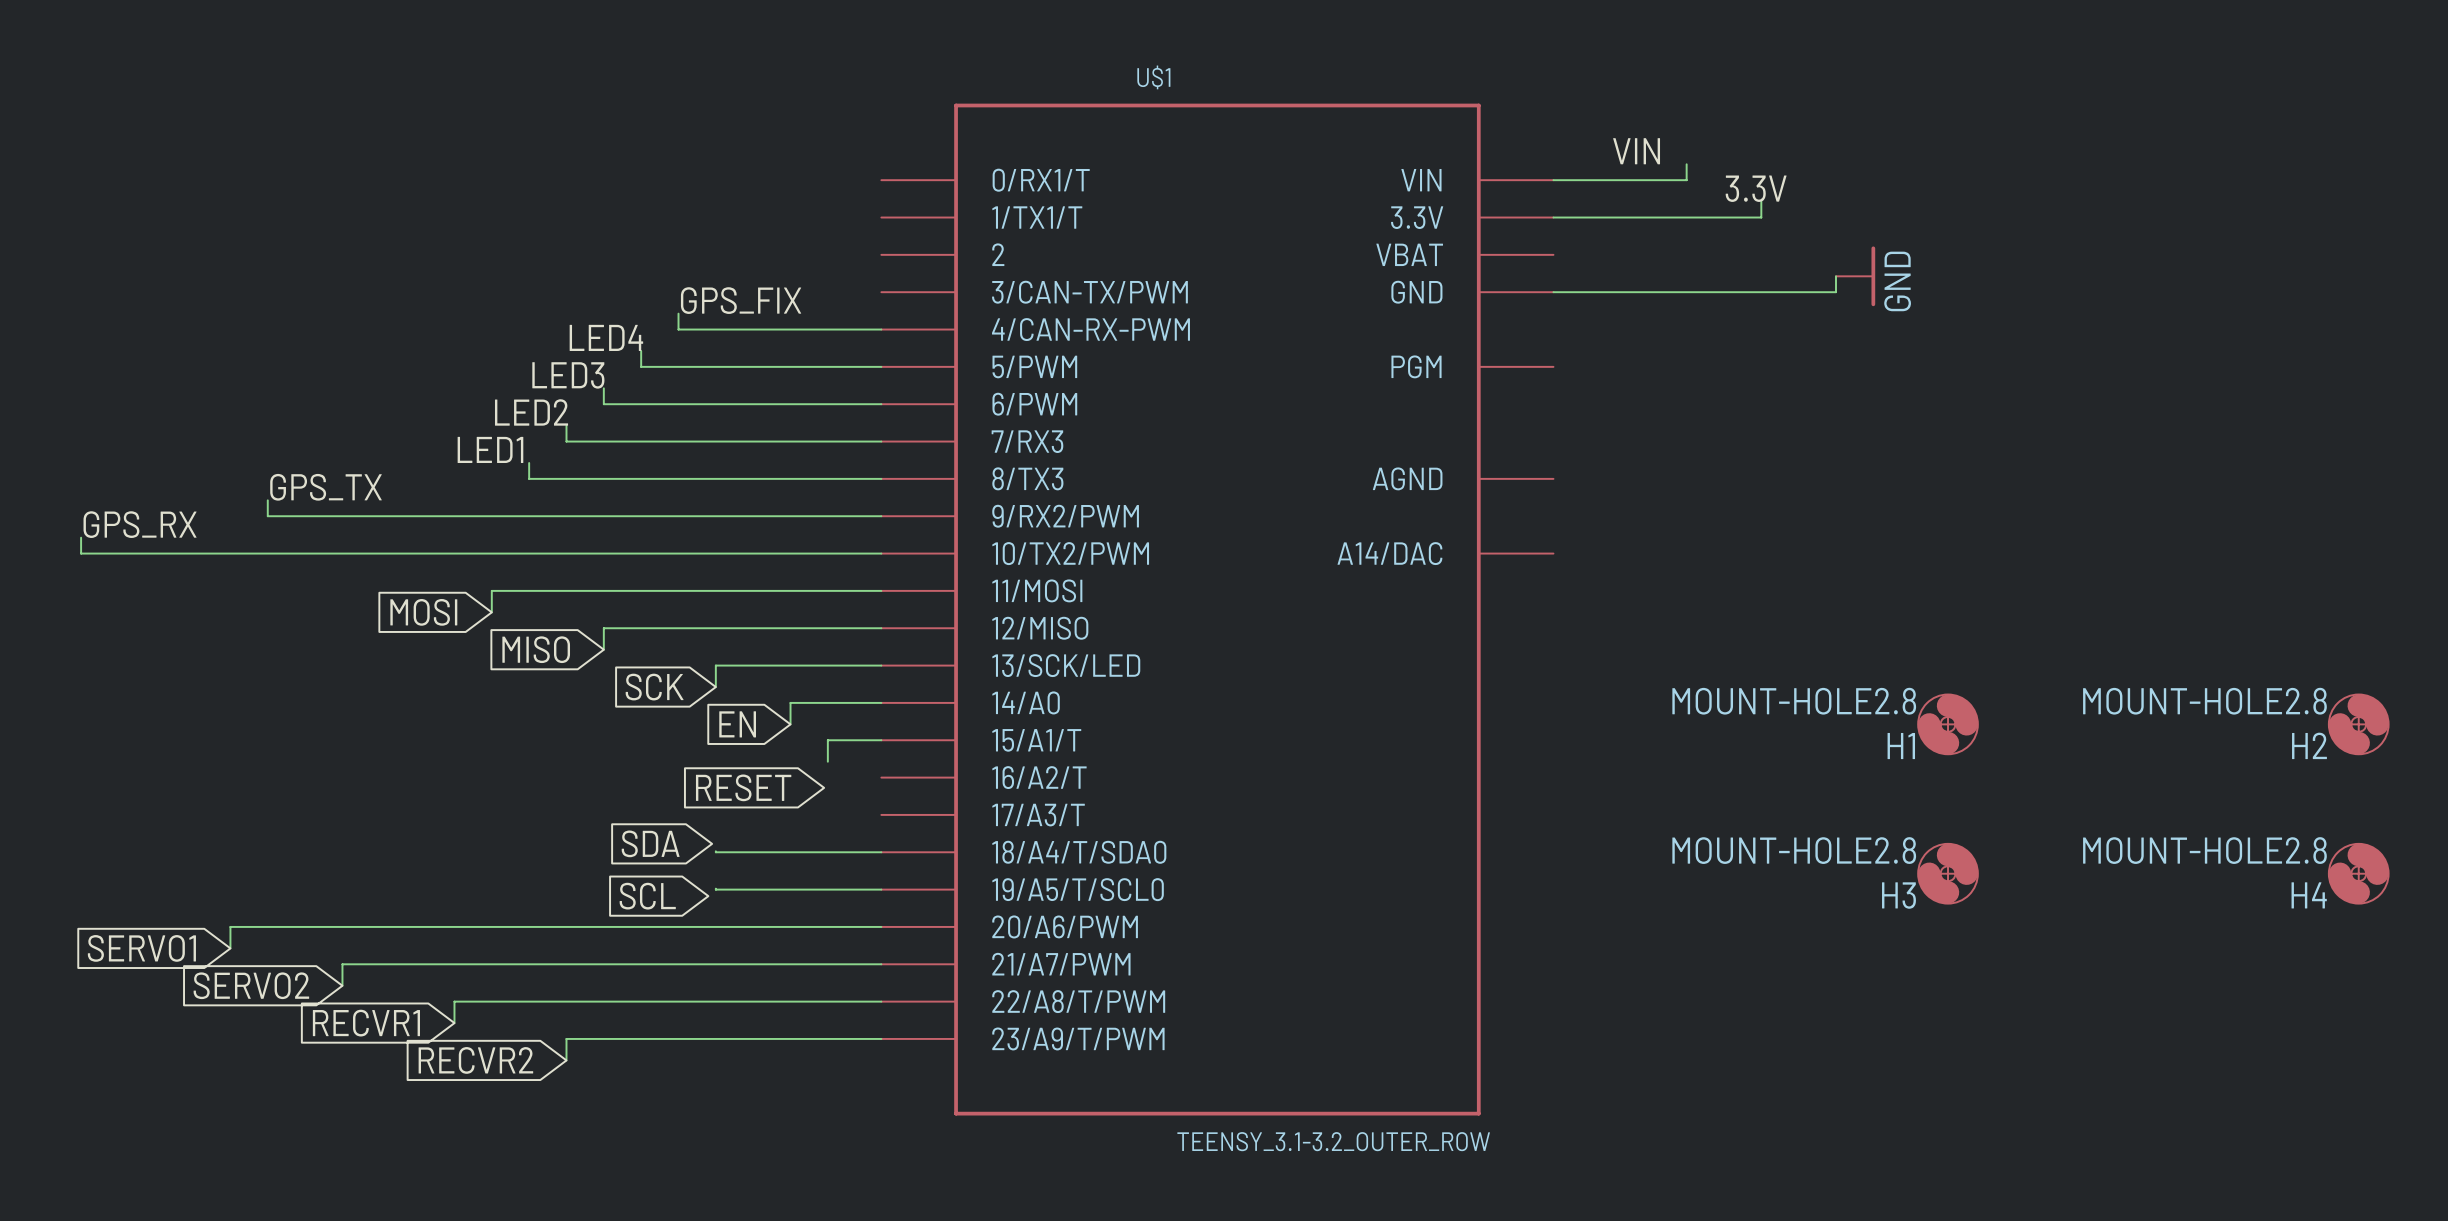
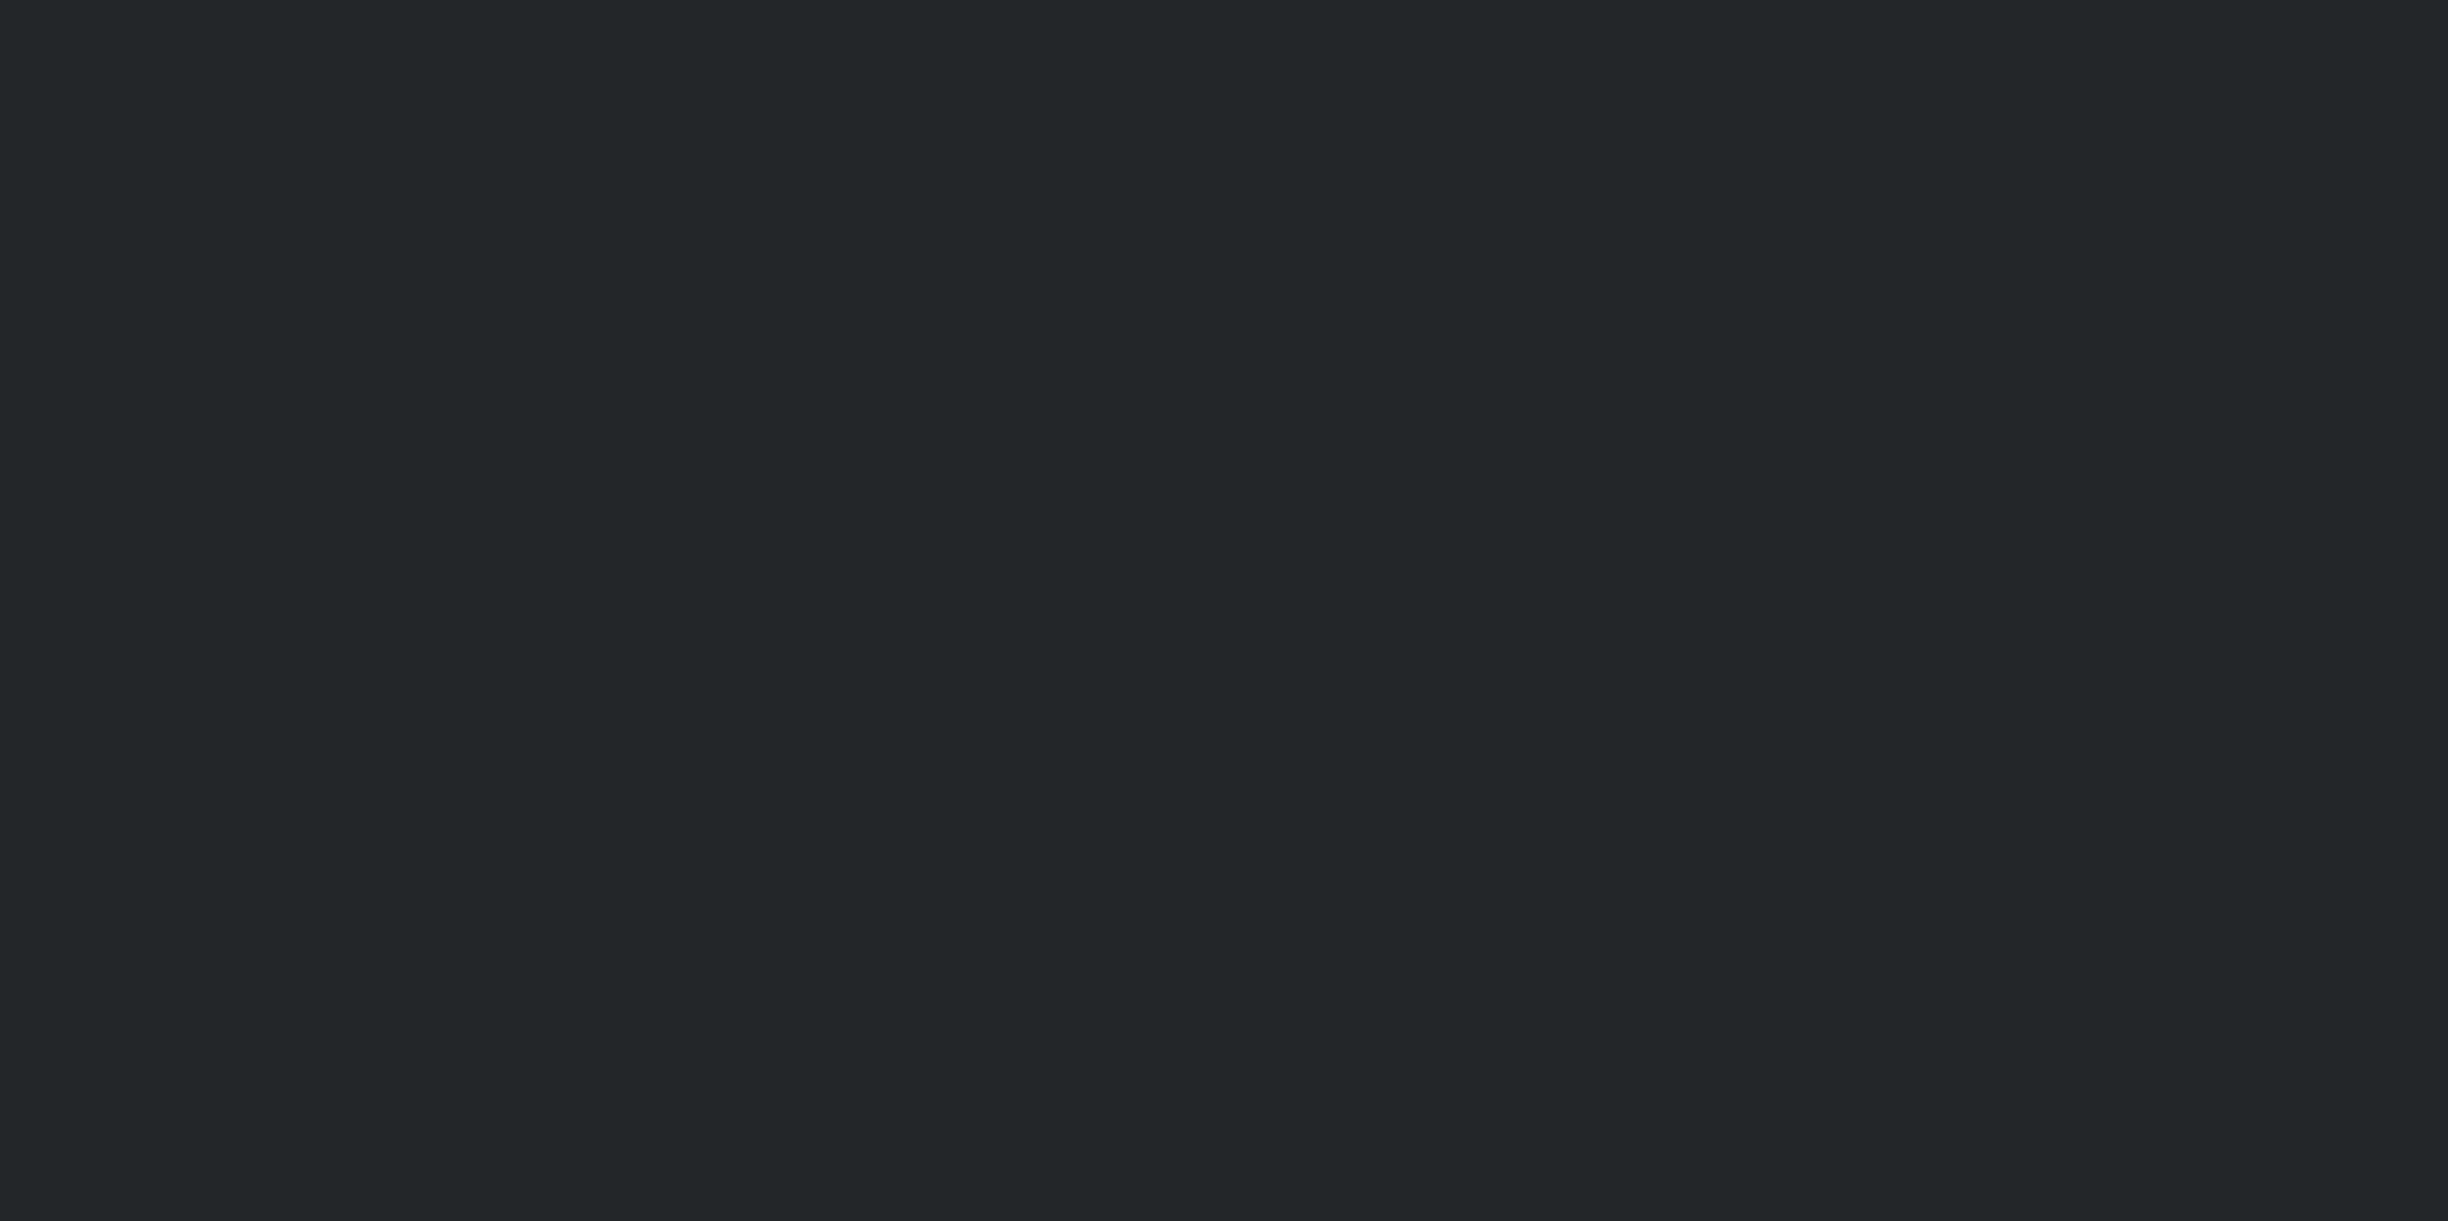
label: VIN (1636, 151) -> none
wire: (1686, 164) (1686, 180) (1553, 180) -> none
label: 3.3V (1756, 188) -> none
wire: (1761, 201) (1761, 217) (1553, 217) -> none
wire: (1836, 276) (1836, 292) (1553, 292) -> none
power symbol: GND (1855, 276) -> none
label: GPS_FIX (741, 300) -> none
wire: (678, 313) (678, 329) (881, 329) -> none
label: LED4 (606, 337) -> none
wire: (641, 350) (641, 366) (881, 366) -> none
label: LED3 (568, 375) -> none
wire: (603, 388) (603, 404) (881, 404) -> none
label: LED2 (531, 412) -> none
wire: (566, 425) (566, 441) (881, 441) -> none
label: LED1 (490, 449) -> none
wire: (529, 463) (529, 478) (881, 478) -> none
label: GPS_TX (326, 487) -> none
wire: (267, 500) (267, 516) (881, 516) -> none
label: GPS_RX (140, 524) -> none
wire: (81, 537) (81, 553) (881, 553) -> none
wire: (881, 590) (491, 590) (491, 612) -> none
U$1: TEENSY_3.1-3.2_OUTER_ROW (1217, 609) -> none
global label: MOSI (423, 612) -> none
wire: (881, 628) (603, 628) (603, 649) -> none
global label: MISO (536, 649) -> none
wire: (881, 665) (715, 665) (715, 687) -> none
global label: SCK (654, 687) -> none
wire: (881, 702) (790, 702) (790, 724) -> none
global label: EN (737, 724) -> none
H1: MOUNT-HOLE2.8 (1948, 724) -> none
H2: MOUNT-HOLE2.8 (2358, 724) -> none
wire: (881, 740) (827, 740) (827, 761) -> none
global label: RESET (743, 787) -> none
global label: SDA (650, 843) -> none
wire: (715, 851) (881, 852) -> none
H3: MOUNT-HOLE2.8 (1948, 873) -> none
H4: MOUNT-HOLE2.8 (2358, 873) -> none
wire: (715, 888) (881, 889) -> none
global label: SCL (647, 896) -> none
wire: (881, 926) (230, 926) (230, 948) -> none
global label: SERVO1 (141, 948) -> none
wire: (881, 964) (342, 964) (342, 985) -> none
global label: SERVO2 (251, 985) -> none
wire: (881, 1001) (454, 1001) (454, 1023) -> none
global label: RECVR1 (366, 1023) -> none
wire: (881, 1038) (566, 1038) (566, 1060) -> none
global label: RECVR2 (475, 1060) -> none

